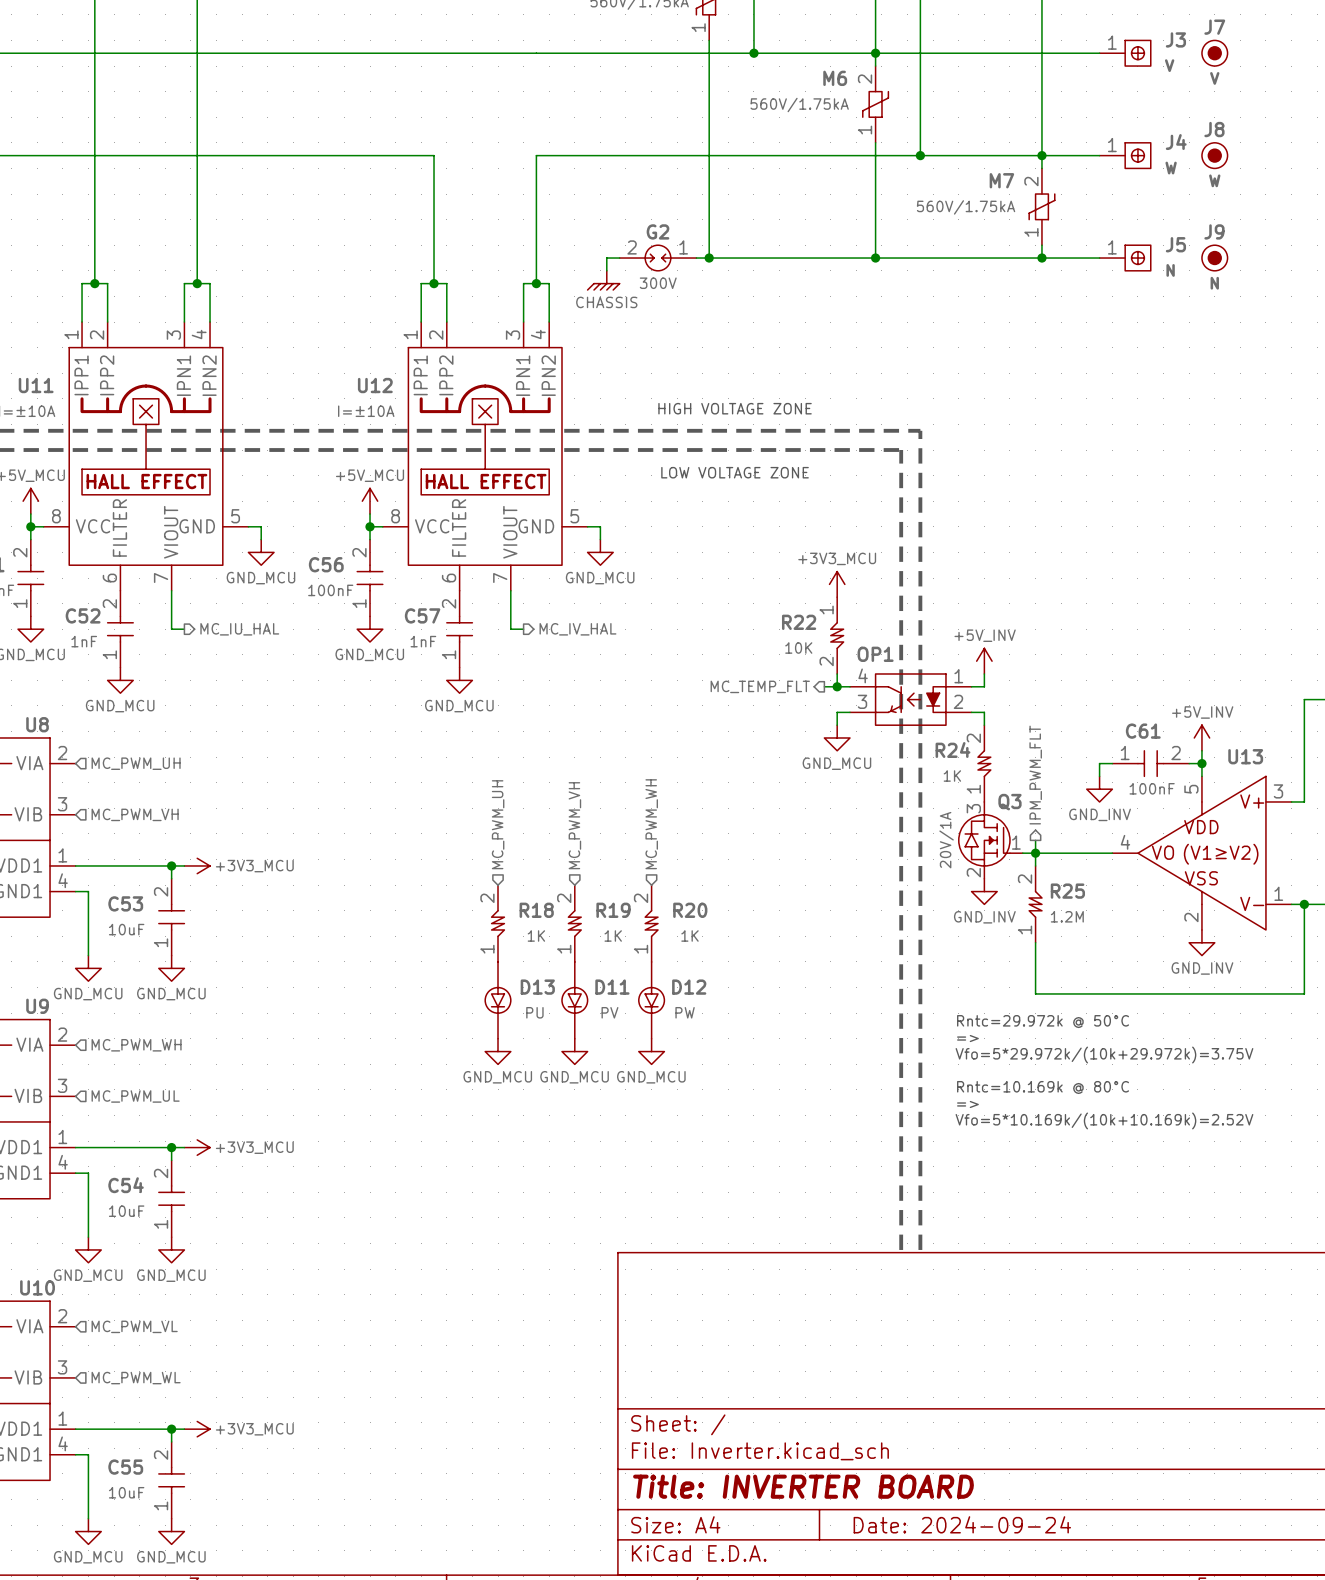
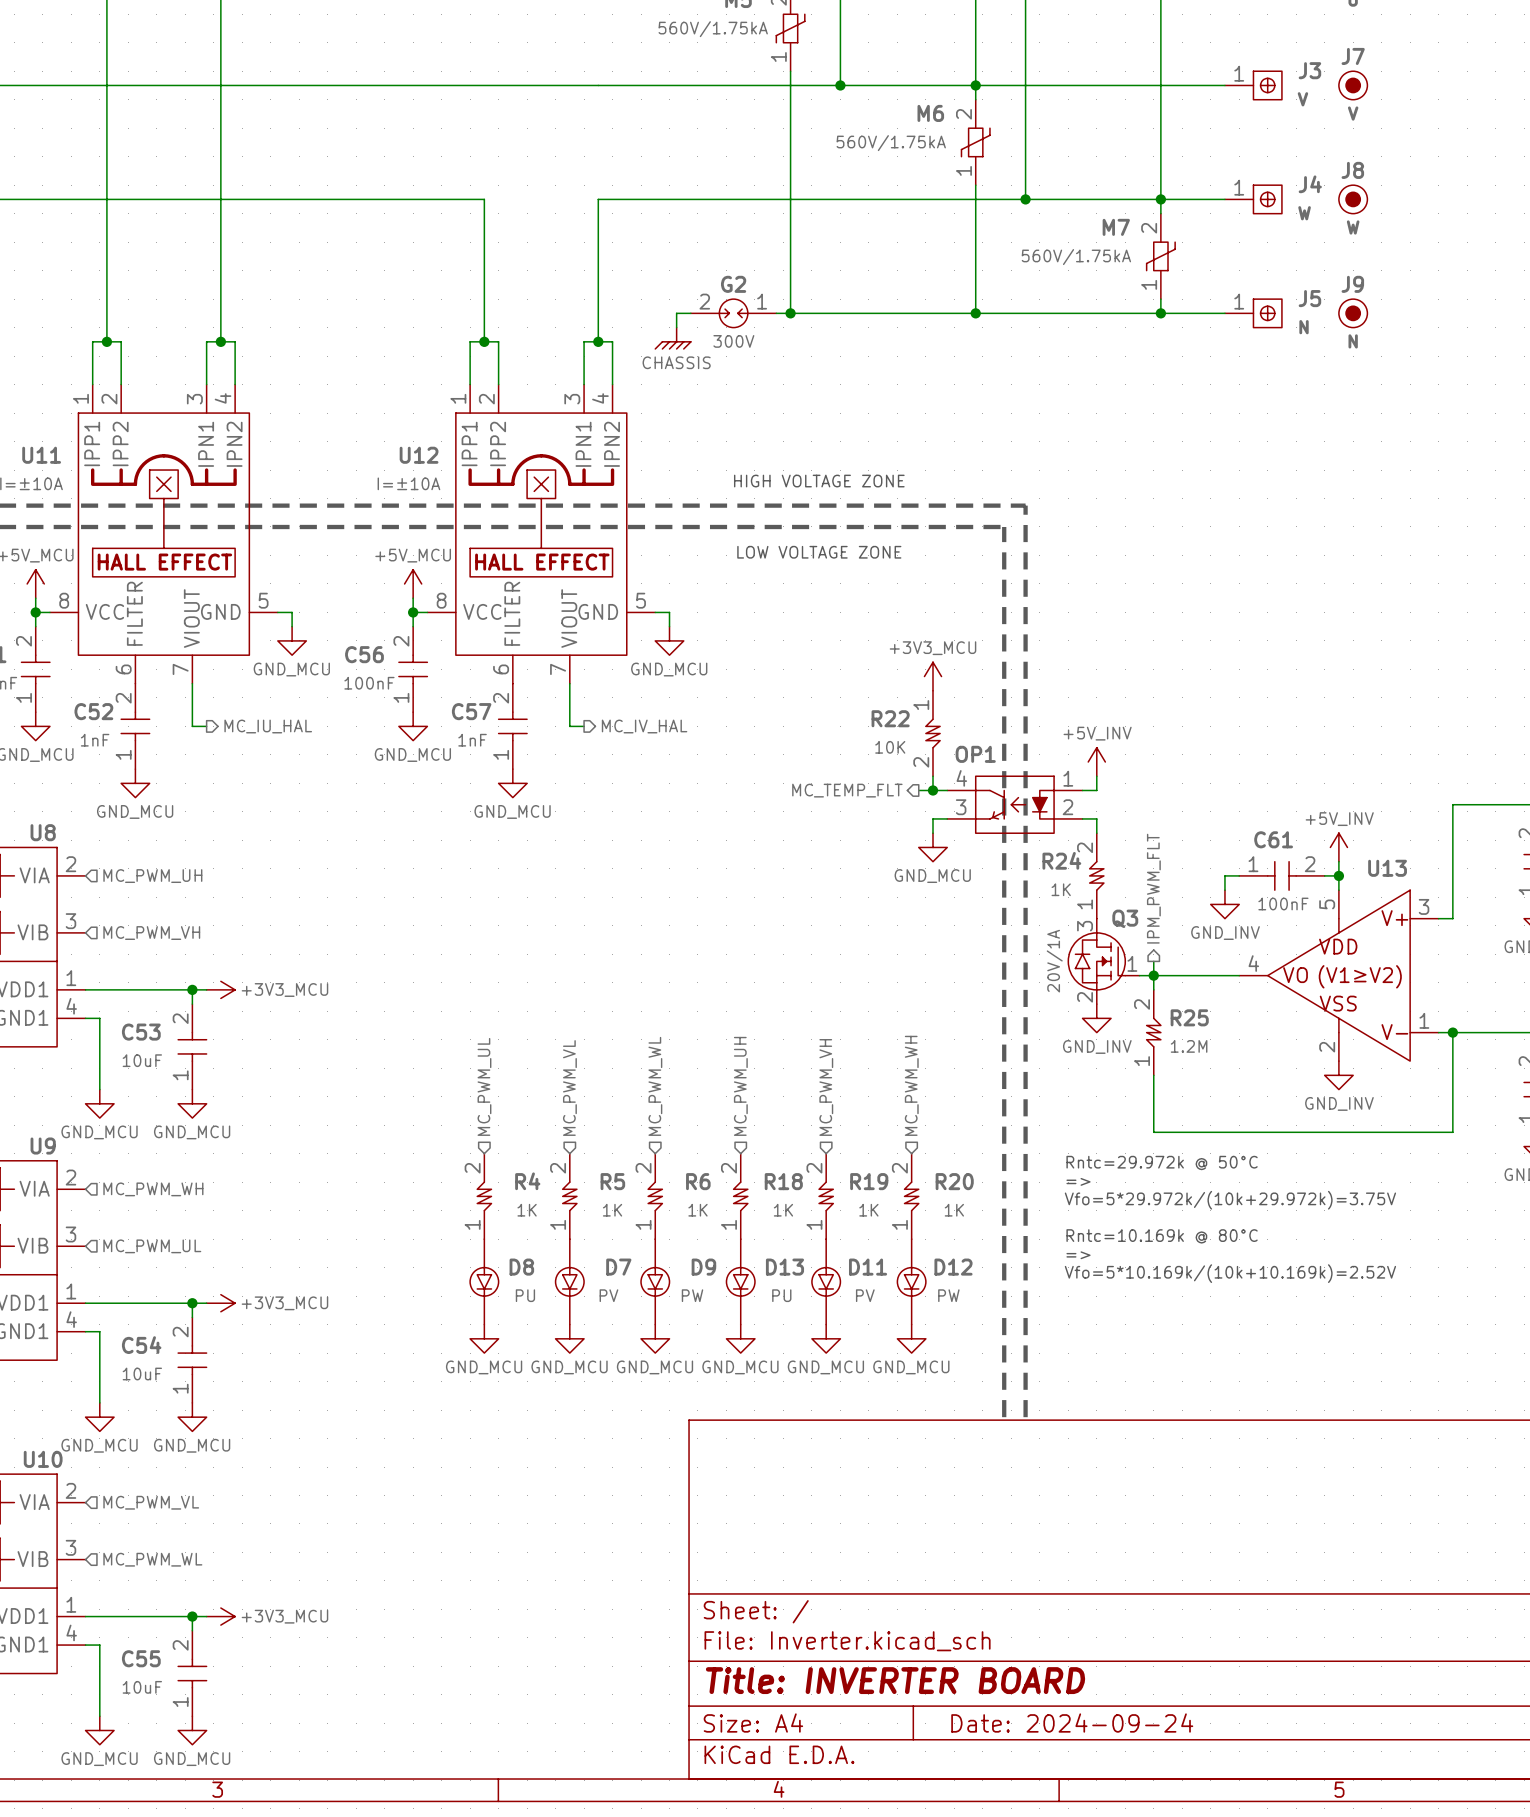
hierarchical label position: MC_PWM_UH (498, 824) -> MC_PWM_UH (740, 1086)
hierarchical label position: MC_PWM_WH (651, 824) -> MC_PWM_WH (911, 1085)
hierarchical label position: MC_PWM_VH (574, 825) -> MC_PWM_VH (826, 1087)
R18 position: (498, 923) -> (740, 1196)
R19 position: (574, 923) -> (826, 1196)
R20 position: (651, 923) -> (911, 1196)
hierarchical label: none -> MC_PWM_WL (655, 1086)
hierarchical label: none -> MC_PWM_UL (484, 1086)
hierarchical label: none -> MC_PWM_VL (569, 1088)
D13 position: (498, 1000) -> (740, 1281)
D11 position: (574, 1000) -> (826, 1281)
D12 position: (651, 1000) -> (911, 1281)
R4: none -> 1K (484, 1196)
power symbol: GND_MCU (498, 1051) -> none
R5: none -> 1K (569, 1196)
power symbol: GND_MCU (574, 1051) -> none
R6: none -> 1K (655, 1196)
power symbol: GND_MCU (651, 1051) -> none
D8: none -> PU (484, 1281)
D7: none -> PV (569, 1281)
D9: none -> PW (655, 1281)
power symbol: none -> GND_MCU (484, 1338)
power symbol: none -> GND_MCU (569, 1338)
power symbol: none -> GND_MCU (655, 1338)
power symbol: none -> GND_MCU (740, 1338)
power symbol: none -> GND_MCU (826, 1338)
power symbol: none -> GND_MCU (911, 1338)

